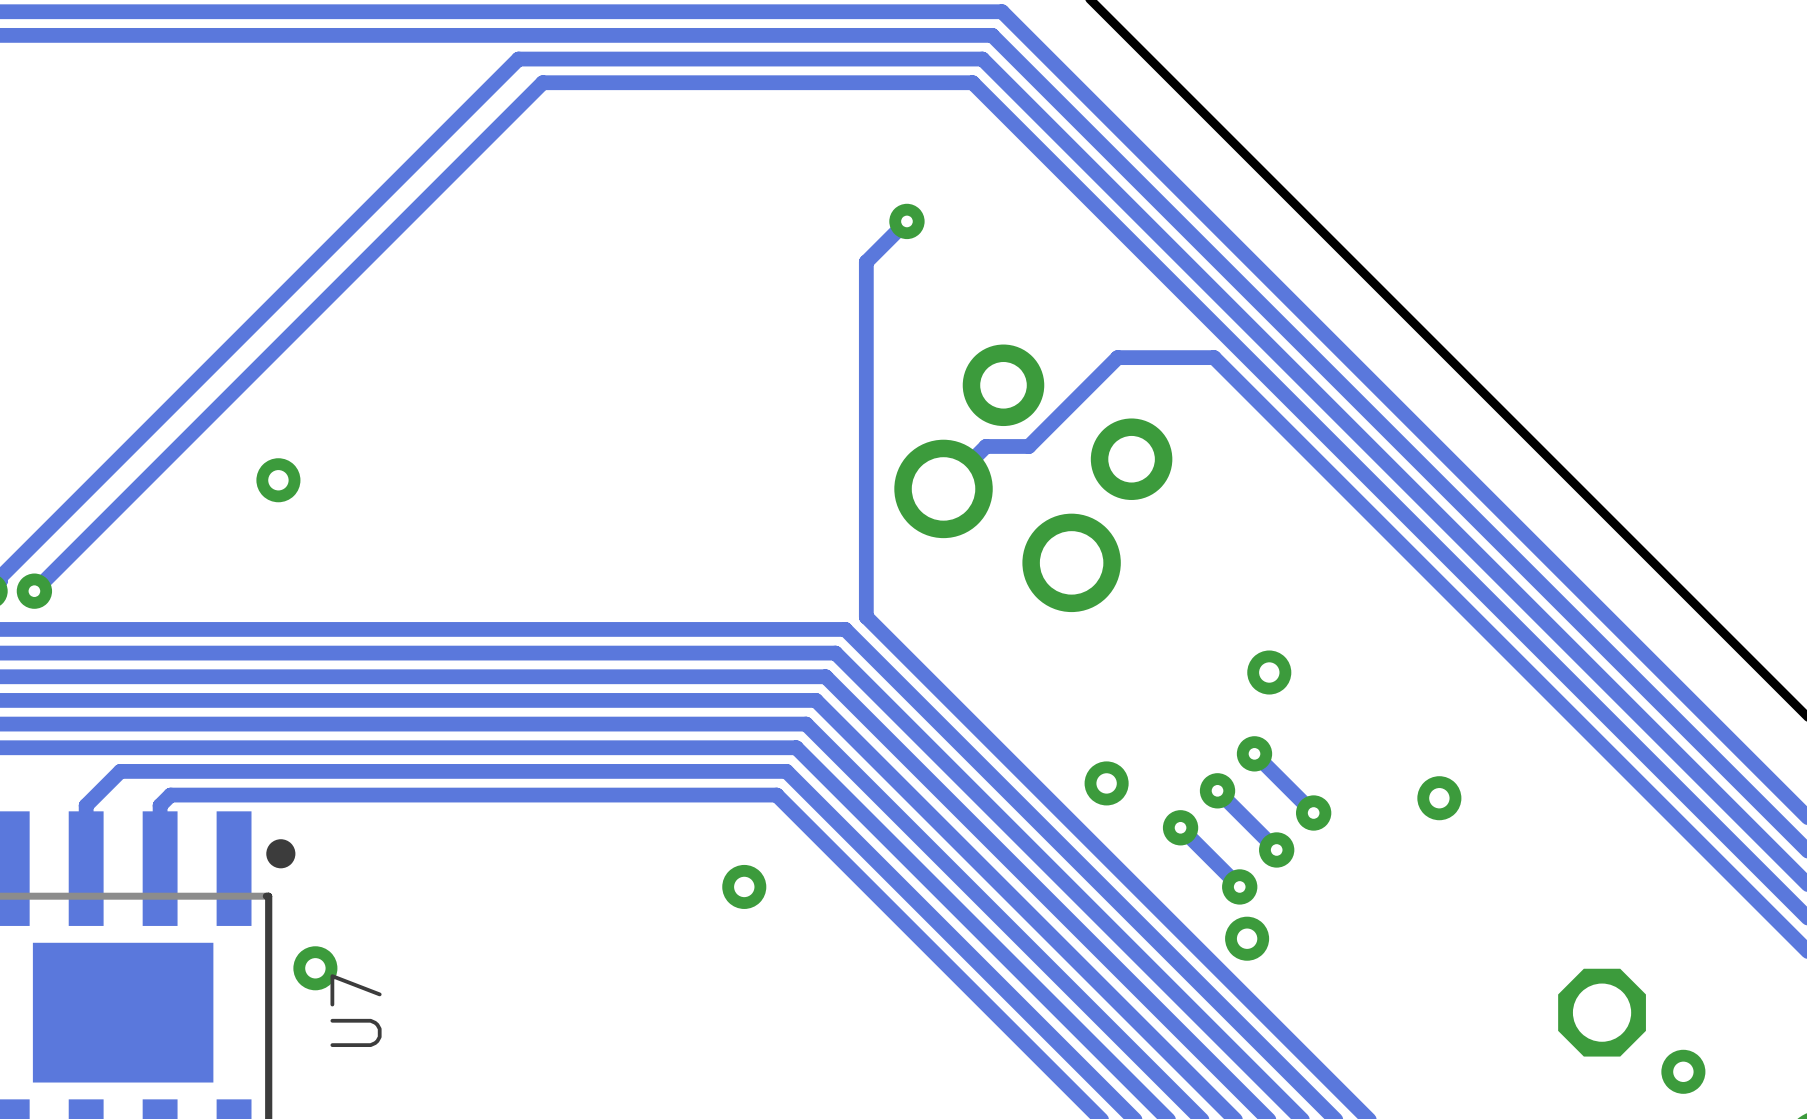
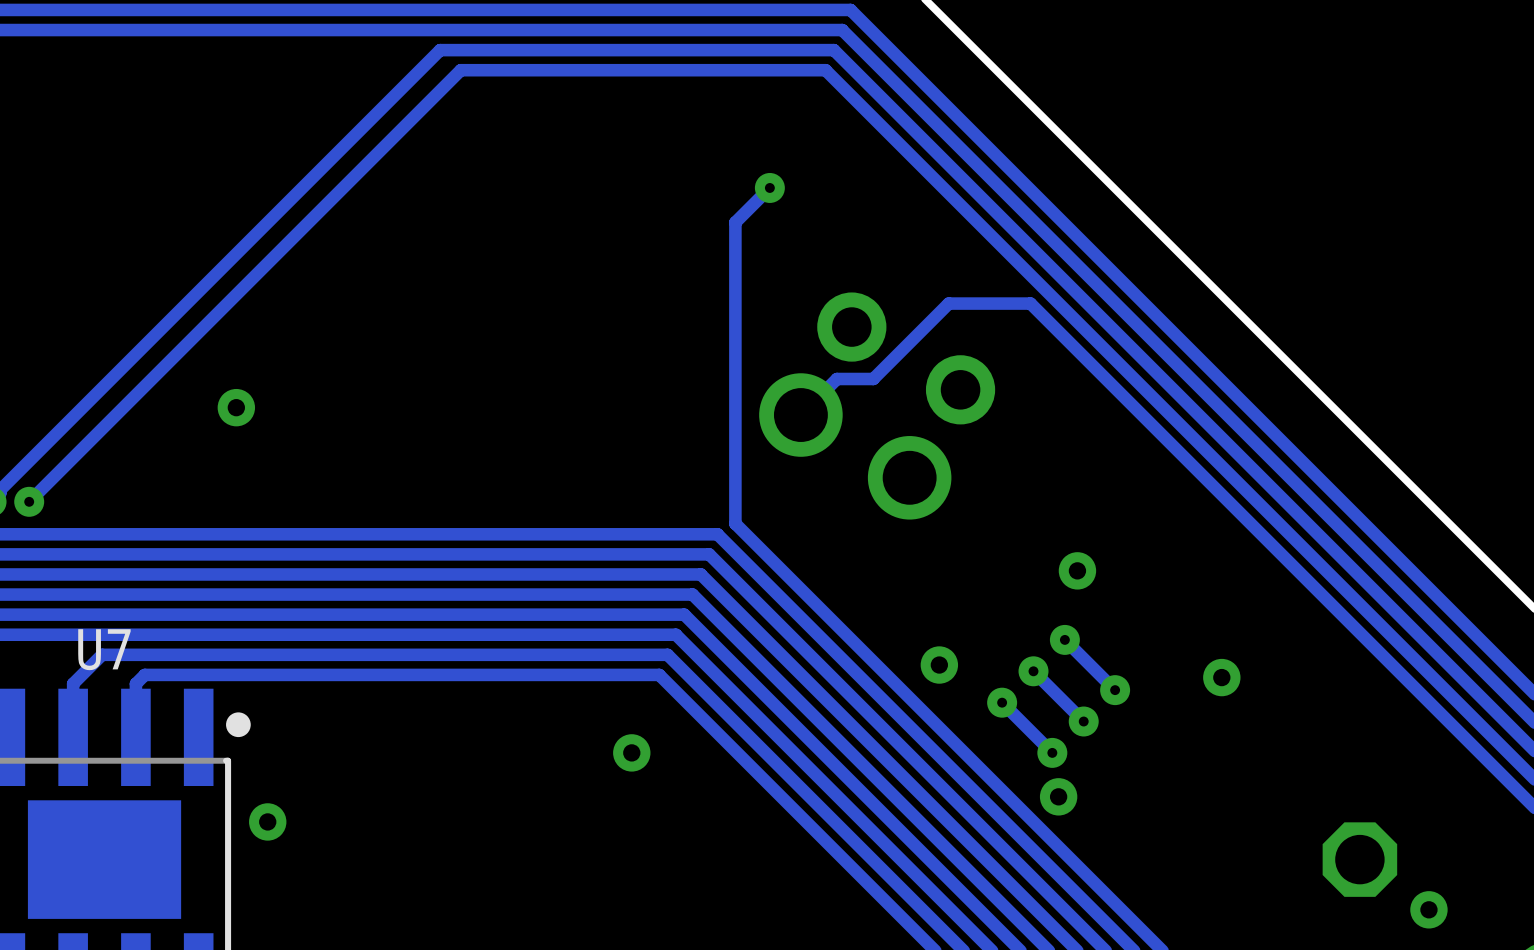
U7 name rotation: 0° (356, 1010) -> 90° clockwise (104, 649)
U7 name position: U7 (356, 1010) -> U7 (104, 649)

